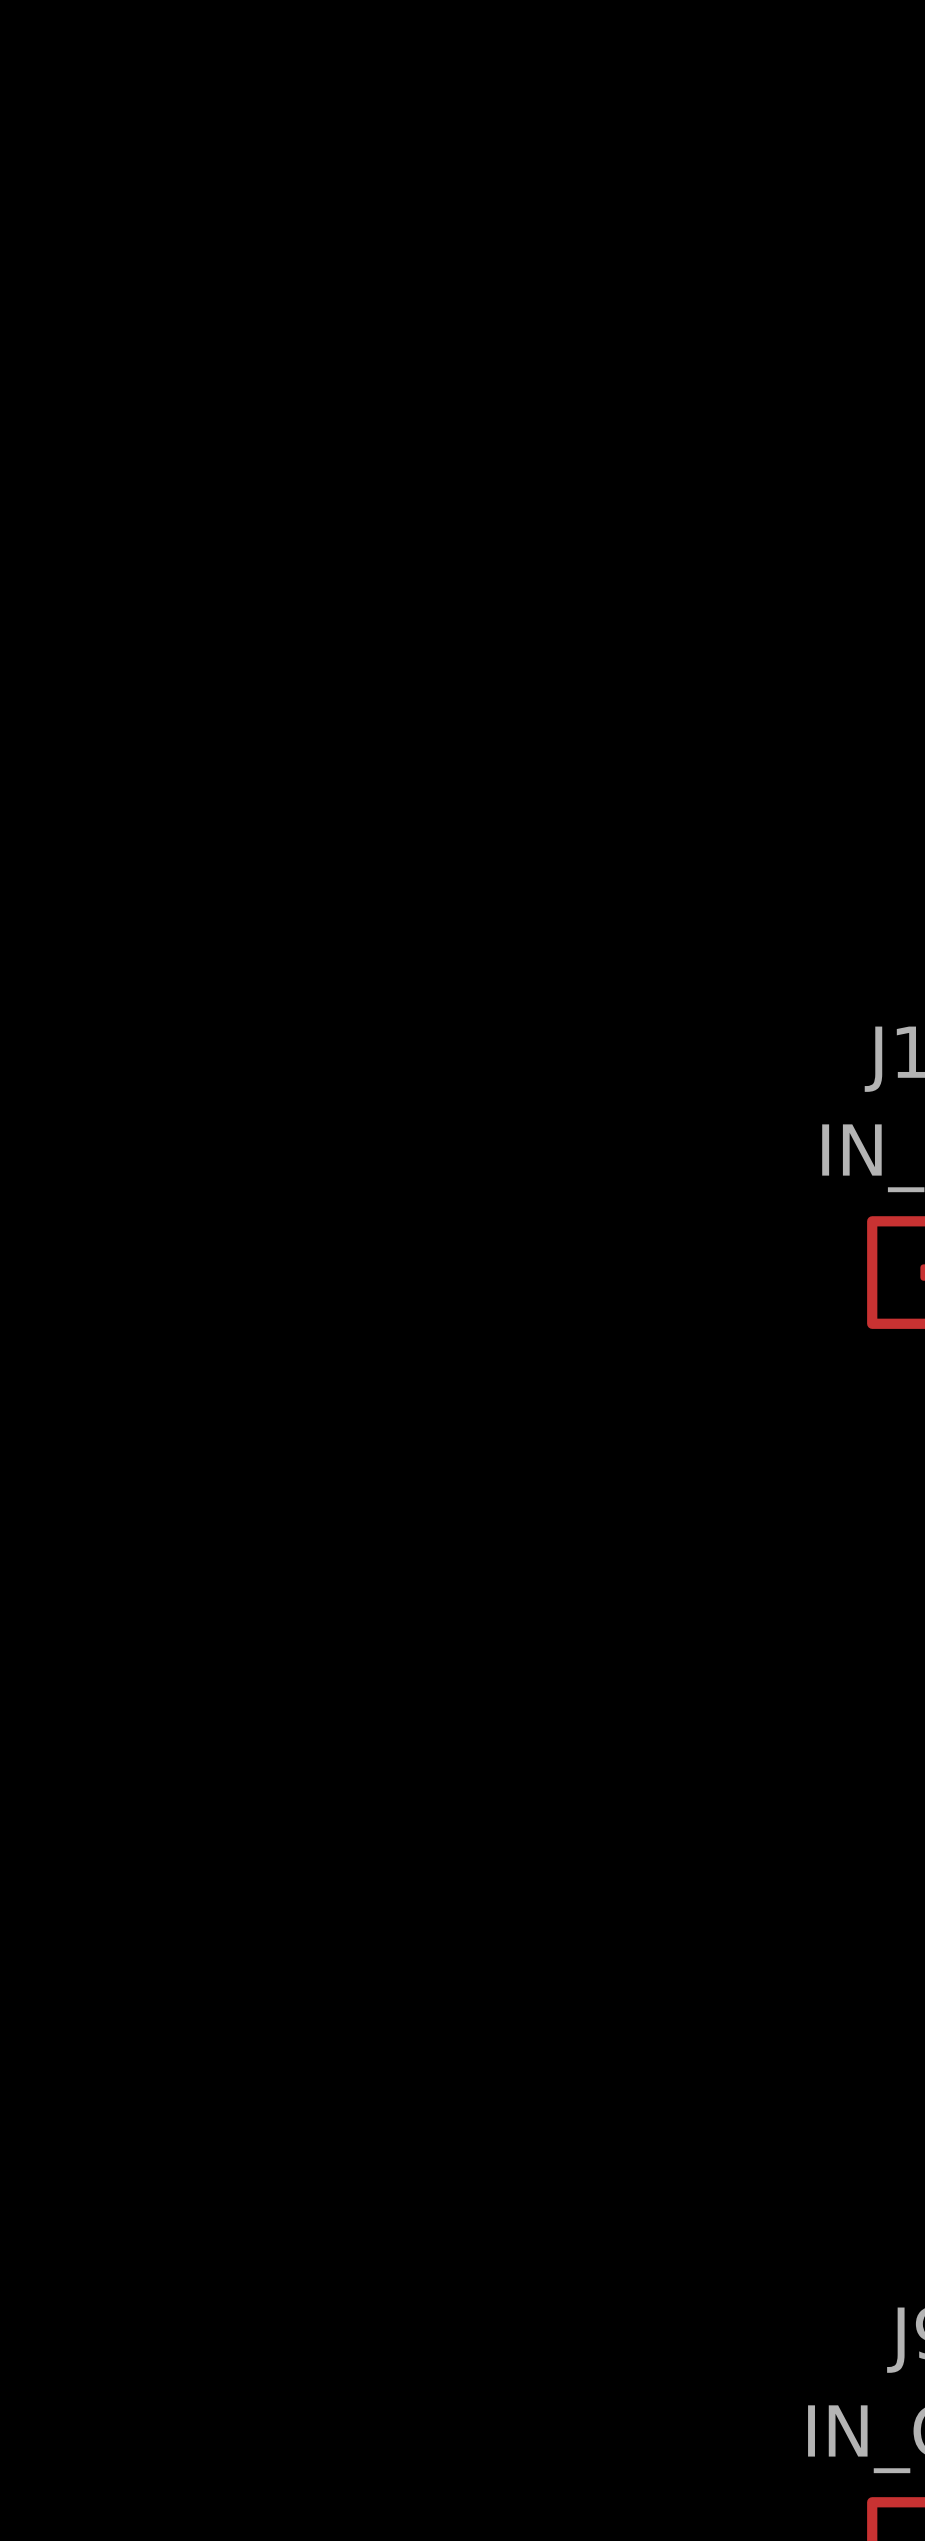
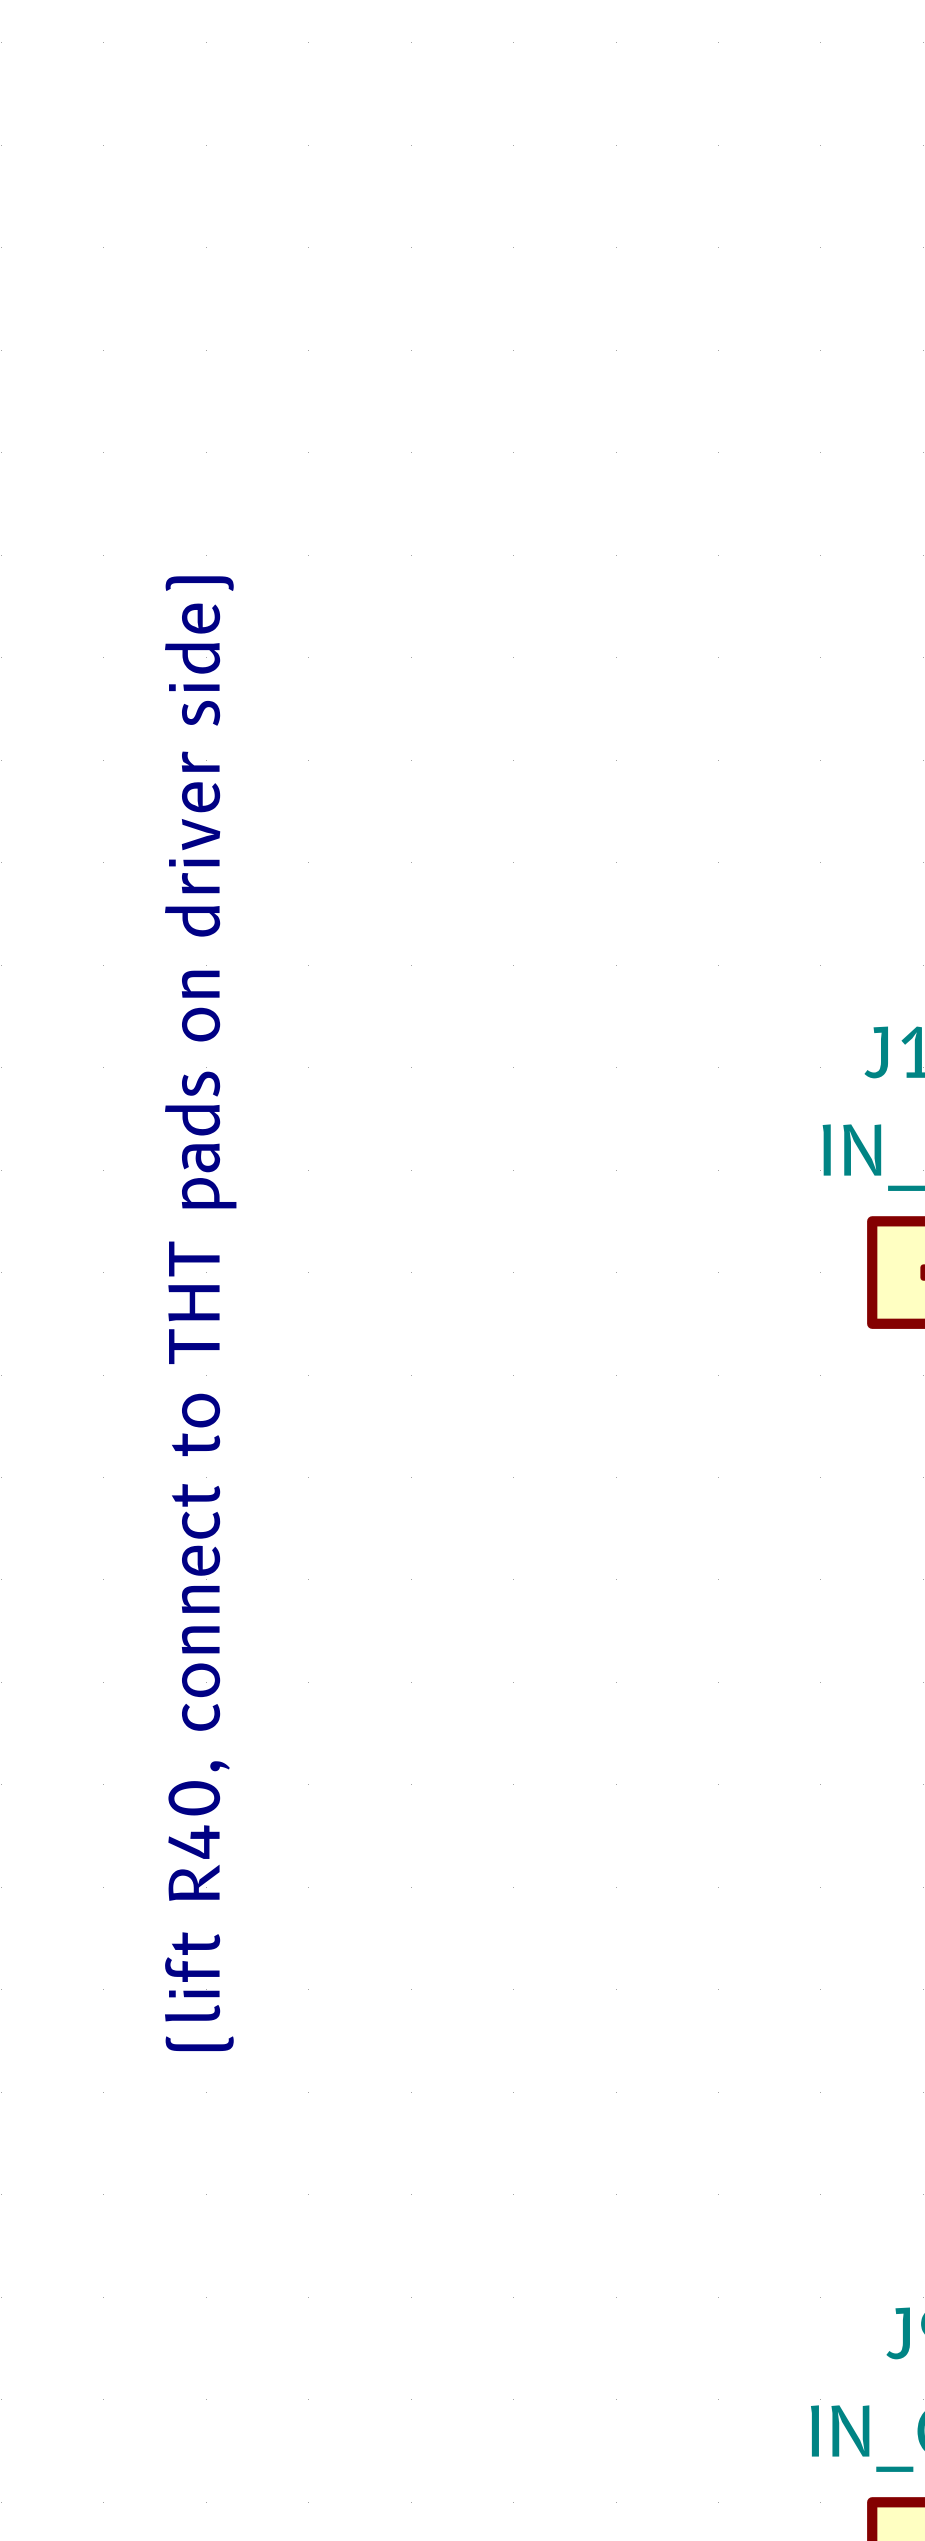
text: none -> (lift R40, connect to THT pads on driver side) (200, 1313)

